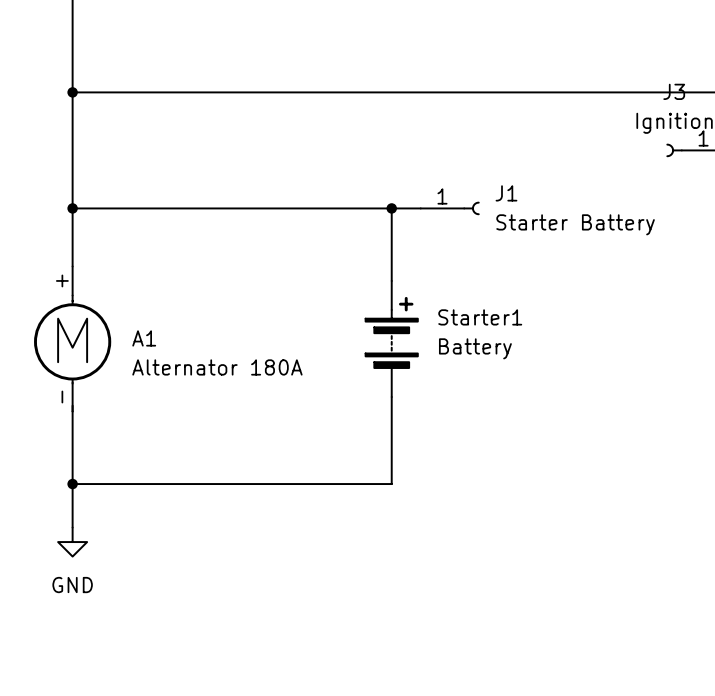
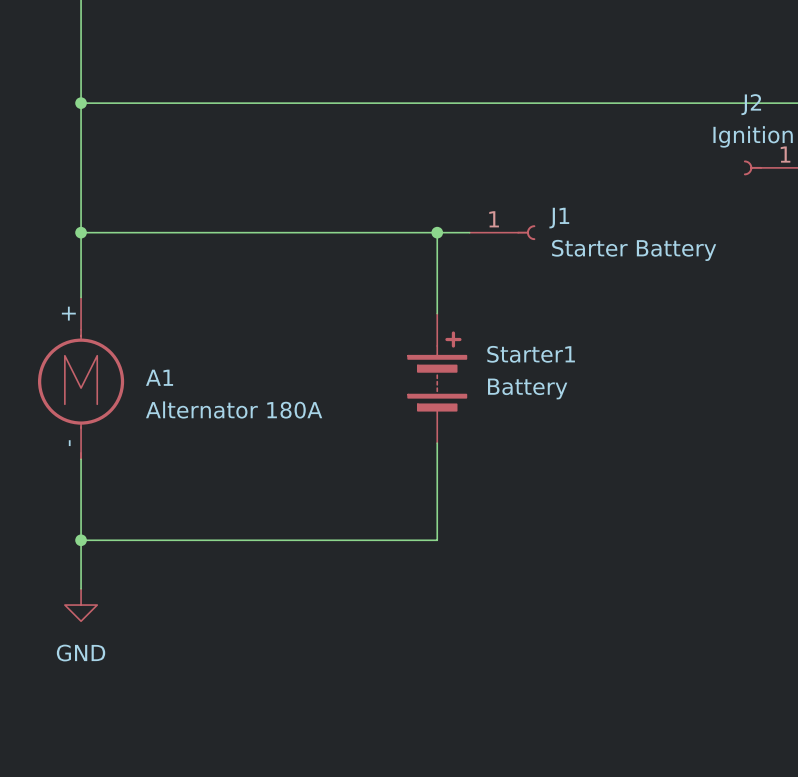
J3 name: J3 (674, 91) -> J2 (751, 104)

